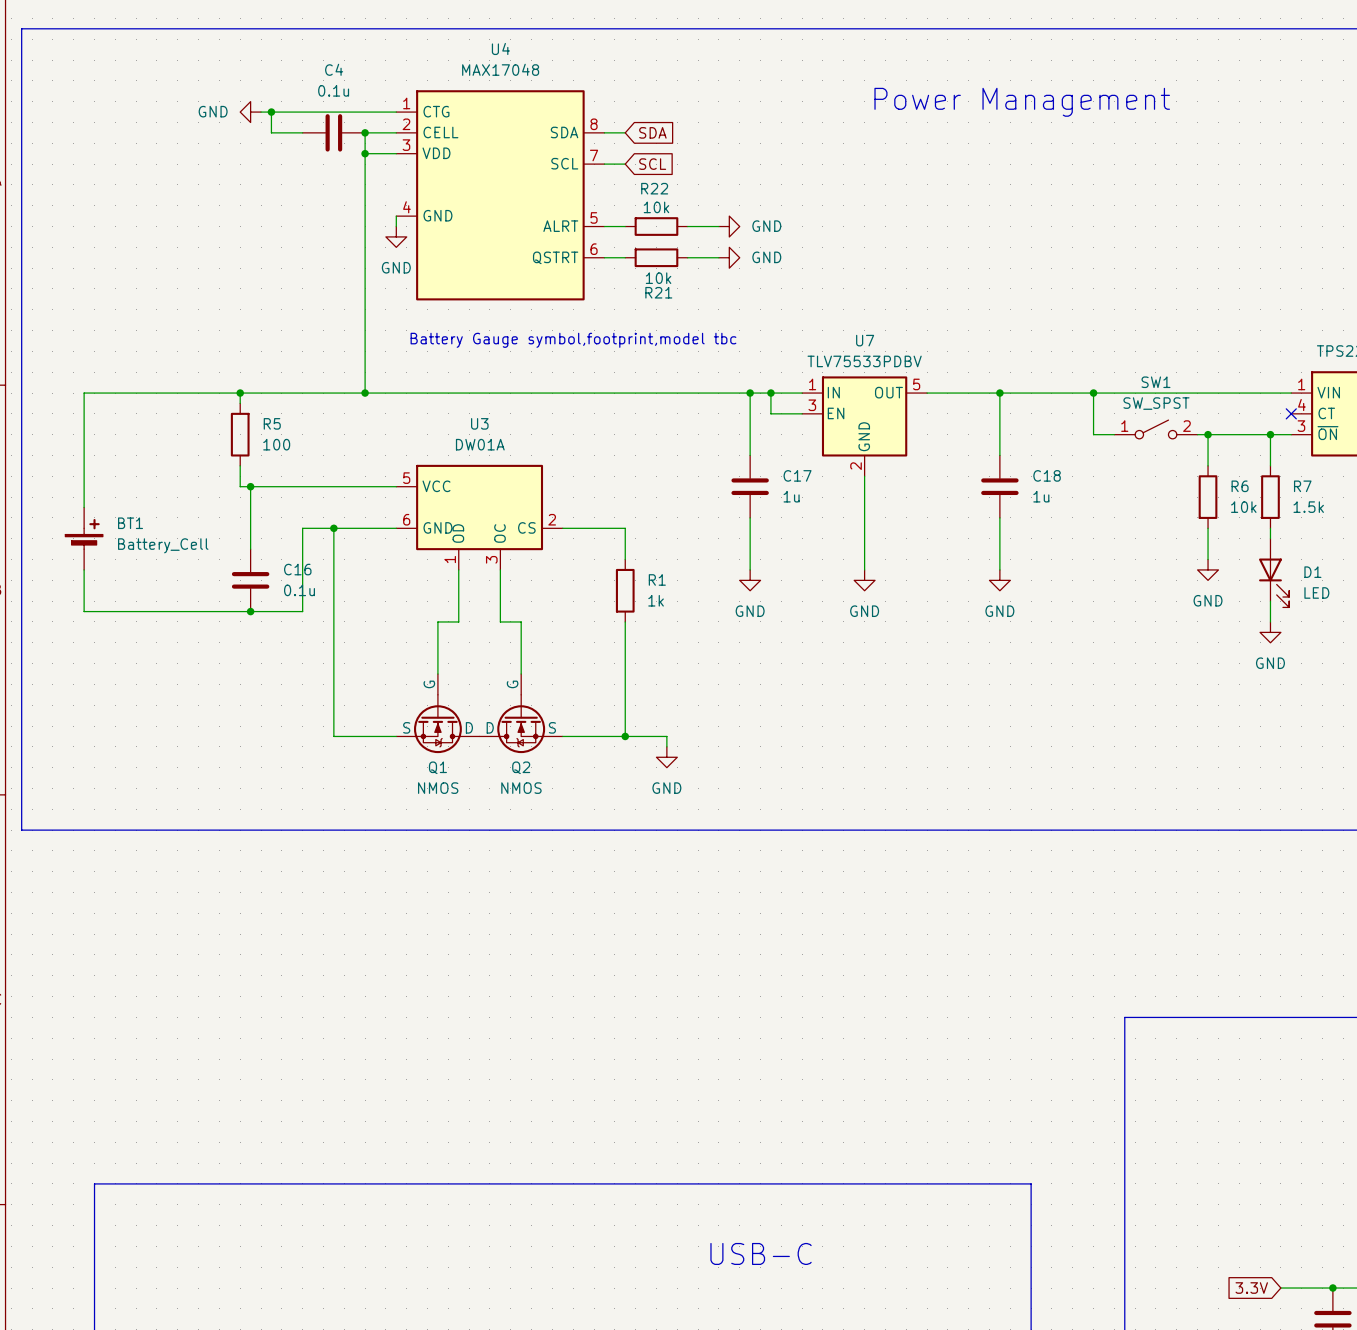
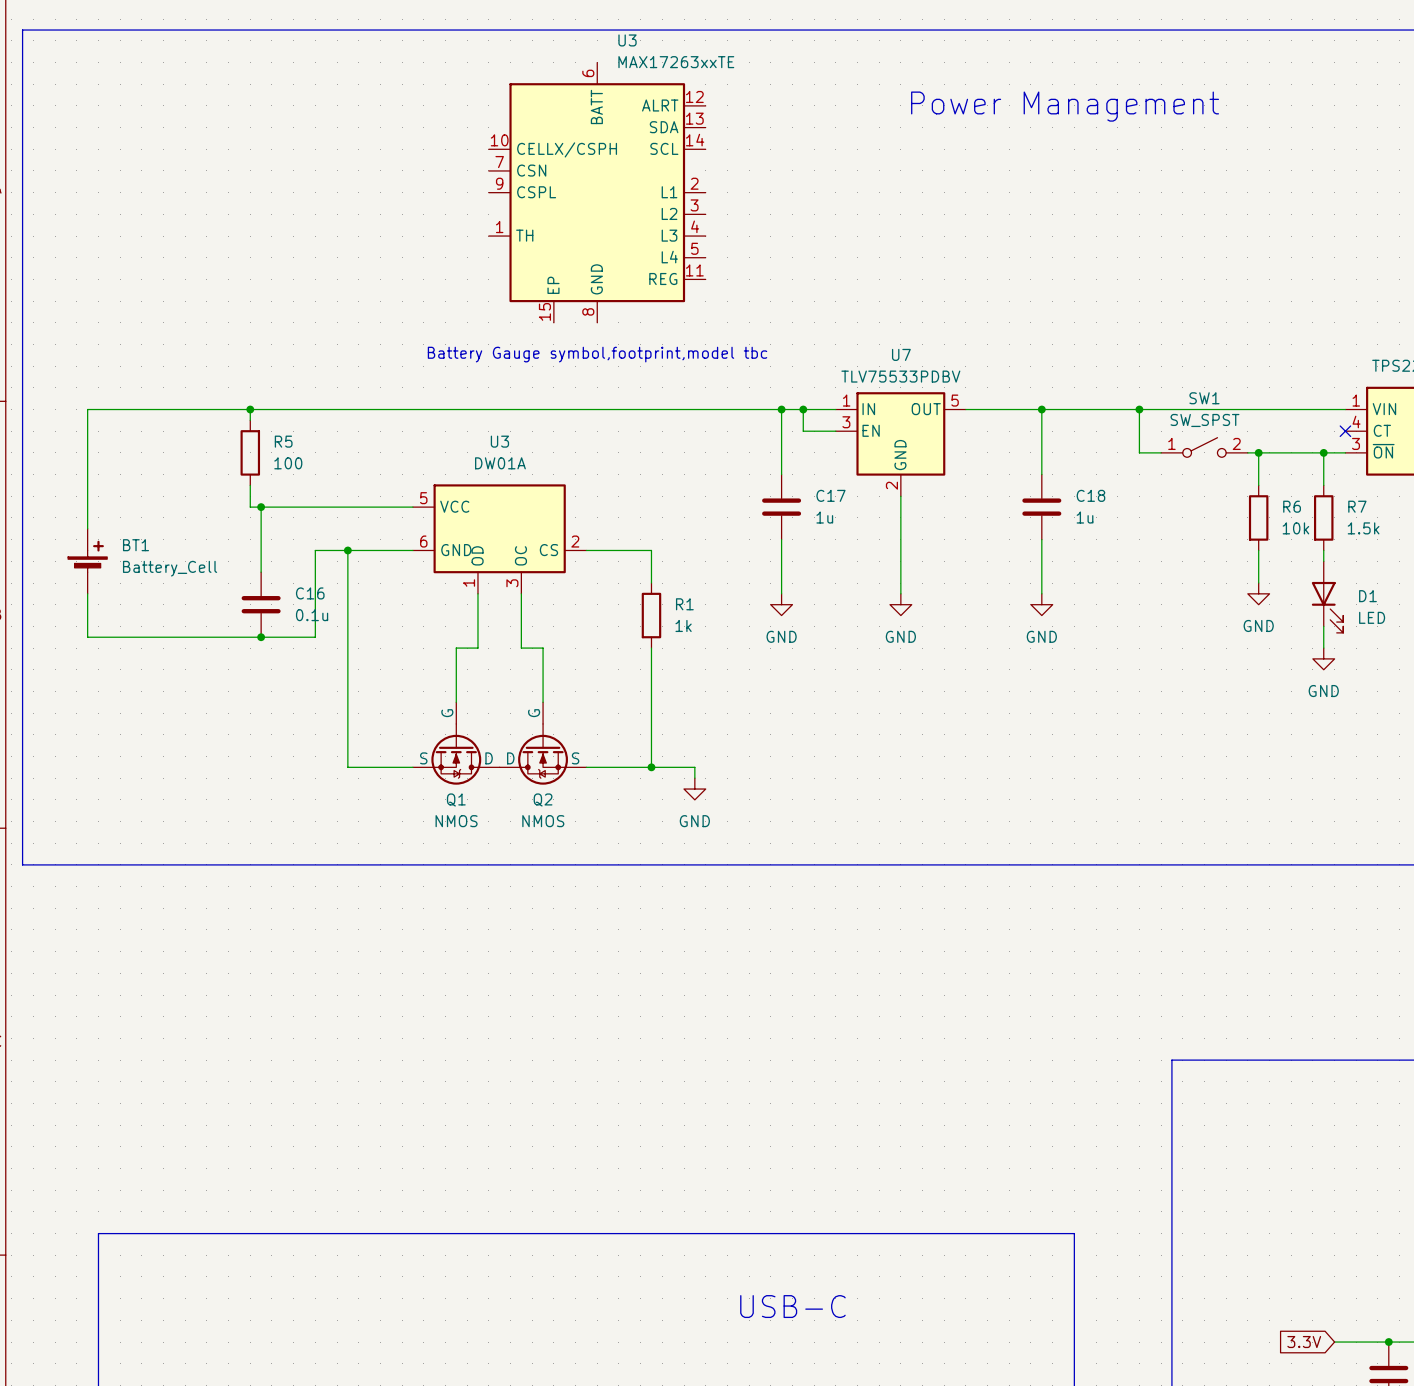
power symbol: GND (250, 112) -> none
wire: (261, 112) (396, 112) -> none
wire: (271, 112) (271, 132) (302, 132) -> none
junction: (271, 112) -> none
C4: 0.1u (333, 132) -> none
junction: (365, 132) -> none
wire: (396, 132) (365, 132) (365, 393) -> none
global label: SDA (652, 132) -> none
wire: (365, 153) (396, 153) -> none
junction: (365, 153) -> none
global label: SCL (652, 164) -> none
U3: none -> MAX17263xxTE (597, 192)
U4: MAX17048 (500, 195) -> none
wire: (396, 216) (396, 226) -> none
R22: 10k (656, 226) -> none
wire: (687, 226) (718, 226) -> none
power symbol: GND (729, 226) -> none
power symbol: GND (396, 236) -> none
R21: 10k (656, 257) -> none
wire: (687, 257) (718, 257) -> none
power symbol: GND (729, 257) -> none
junction: (365, 393) -> none

